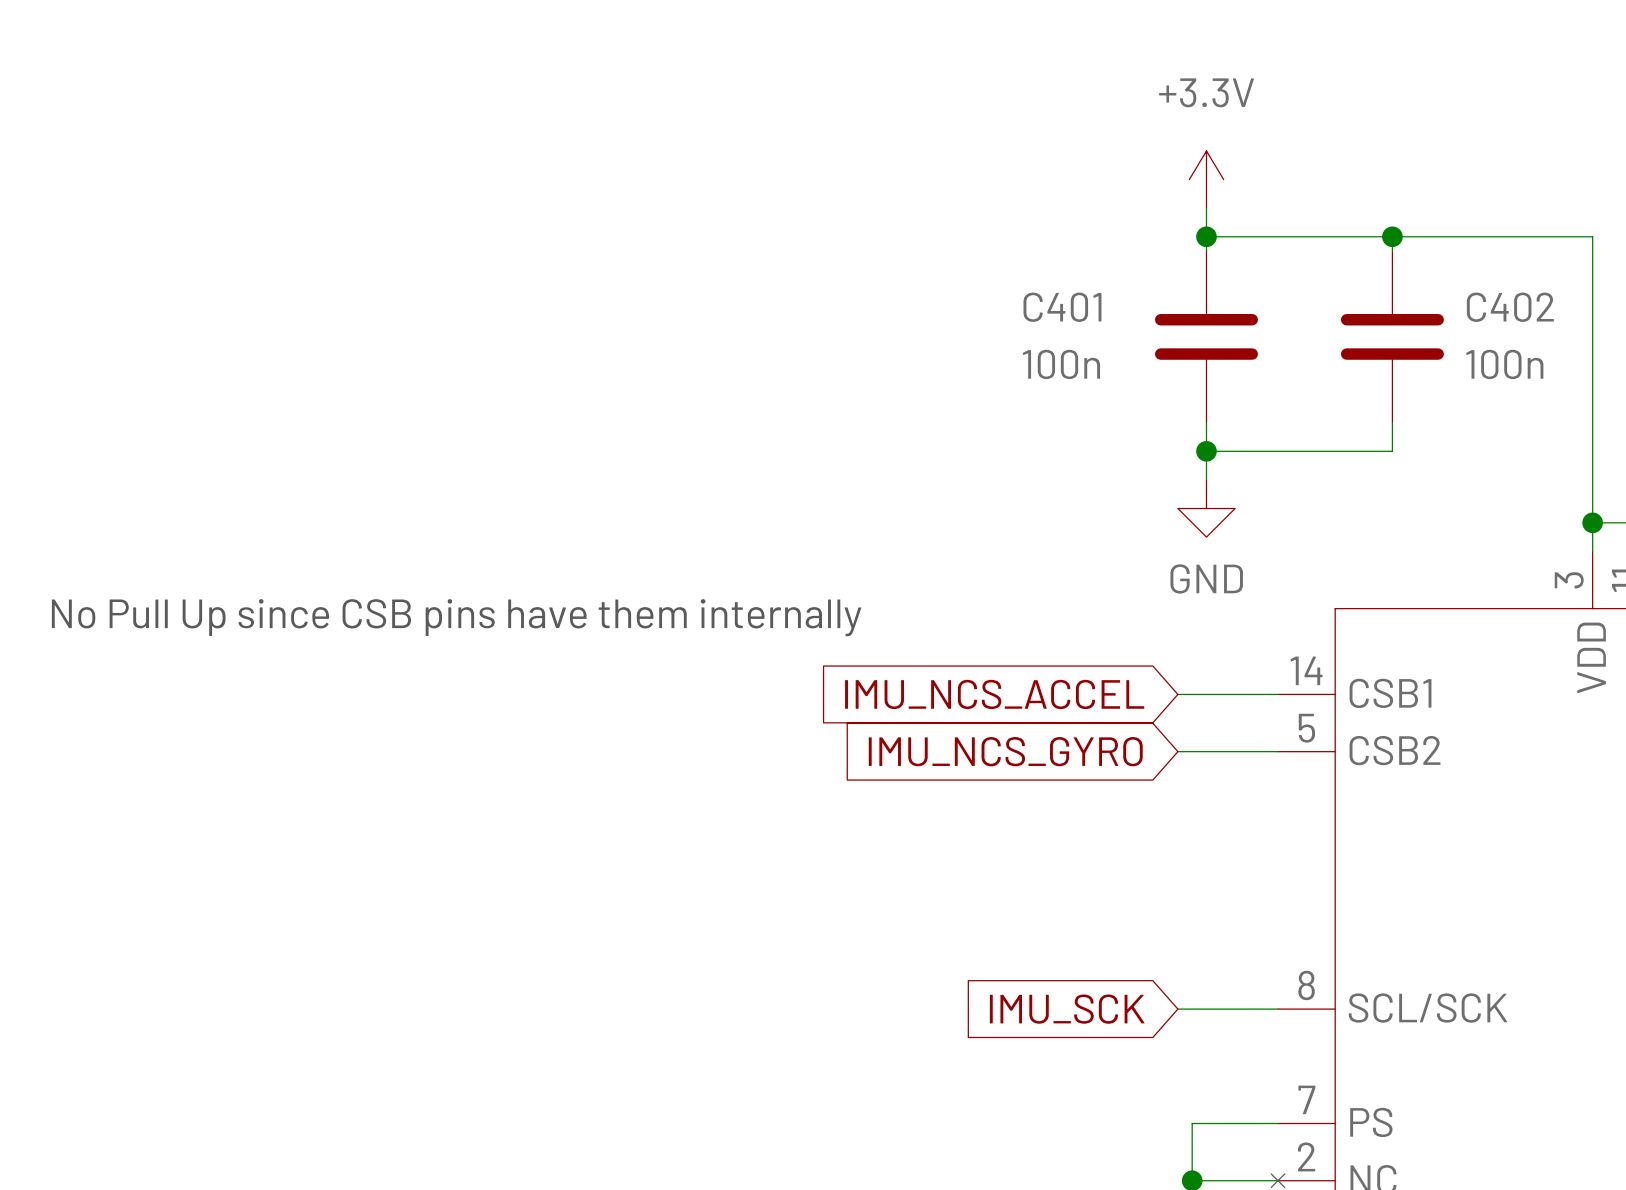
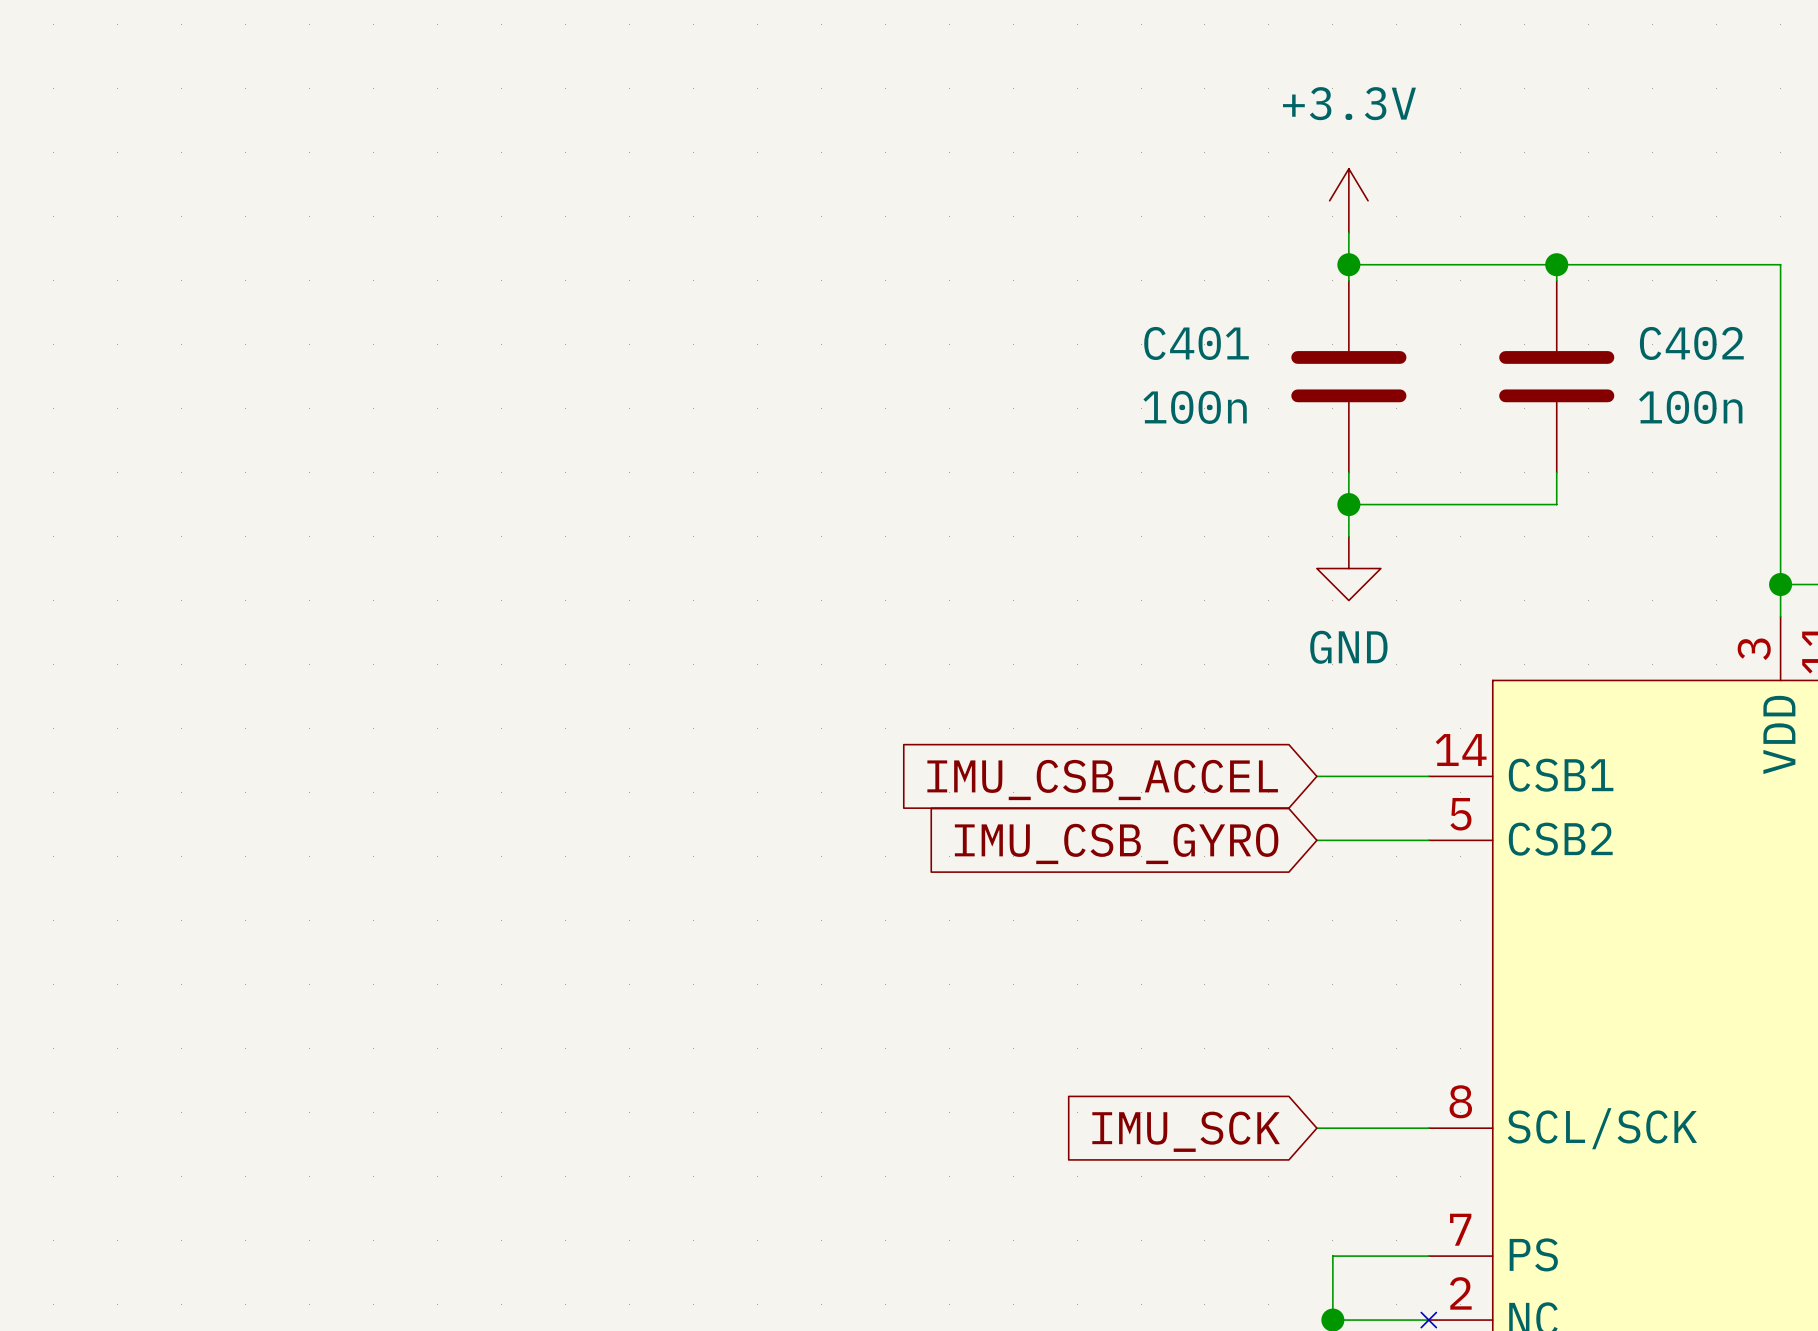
text: No Pull Up since CSB pins have them internally (456, 617) -> none
global label: IMU_NCS_ACCEL (994, 694) -> IMU_CSB_ACCEL (1102, 780)
global label: IMU_NCS_GYRO (1005, 751) -> IMU_CSB_GYRO (1116, 843)

